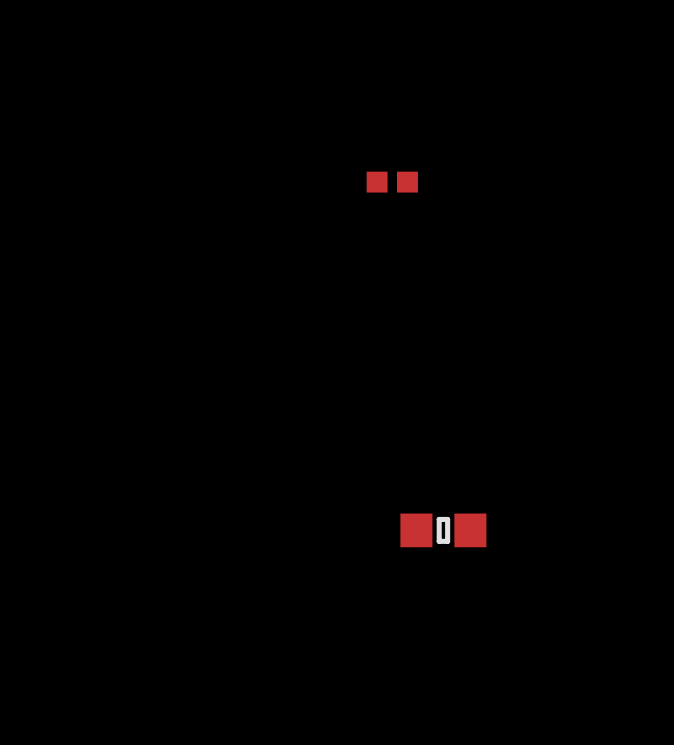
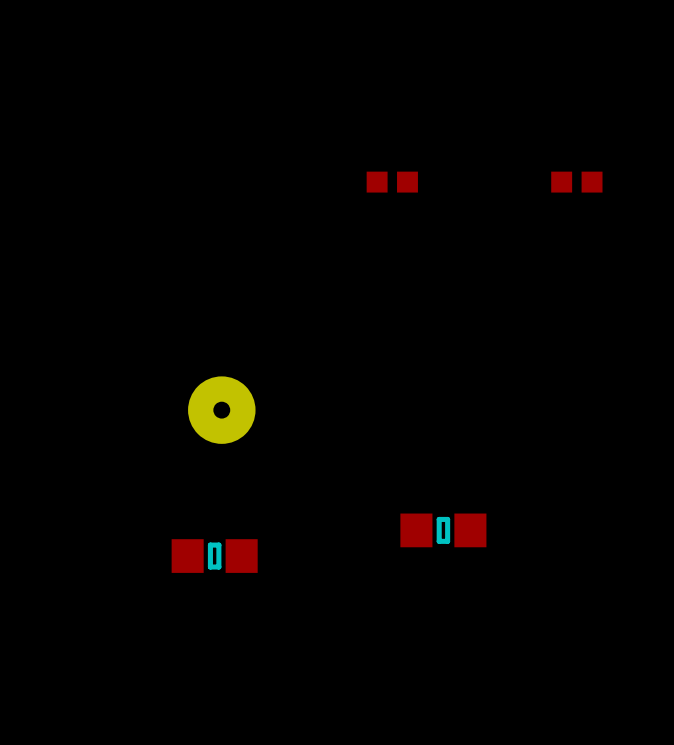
part: none -> (576, 182)
part: none -> (221, 410)
part: none -> (214, 556)

